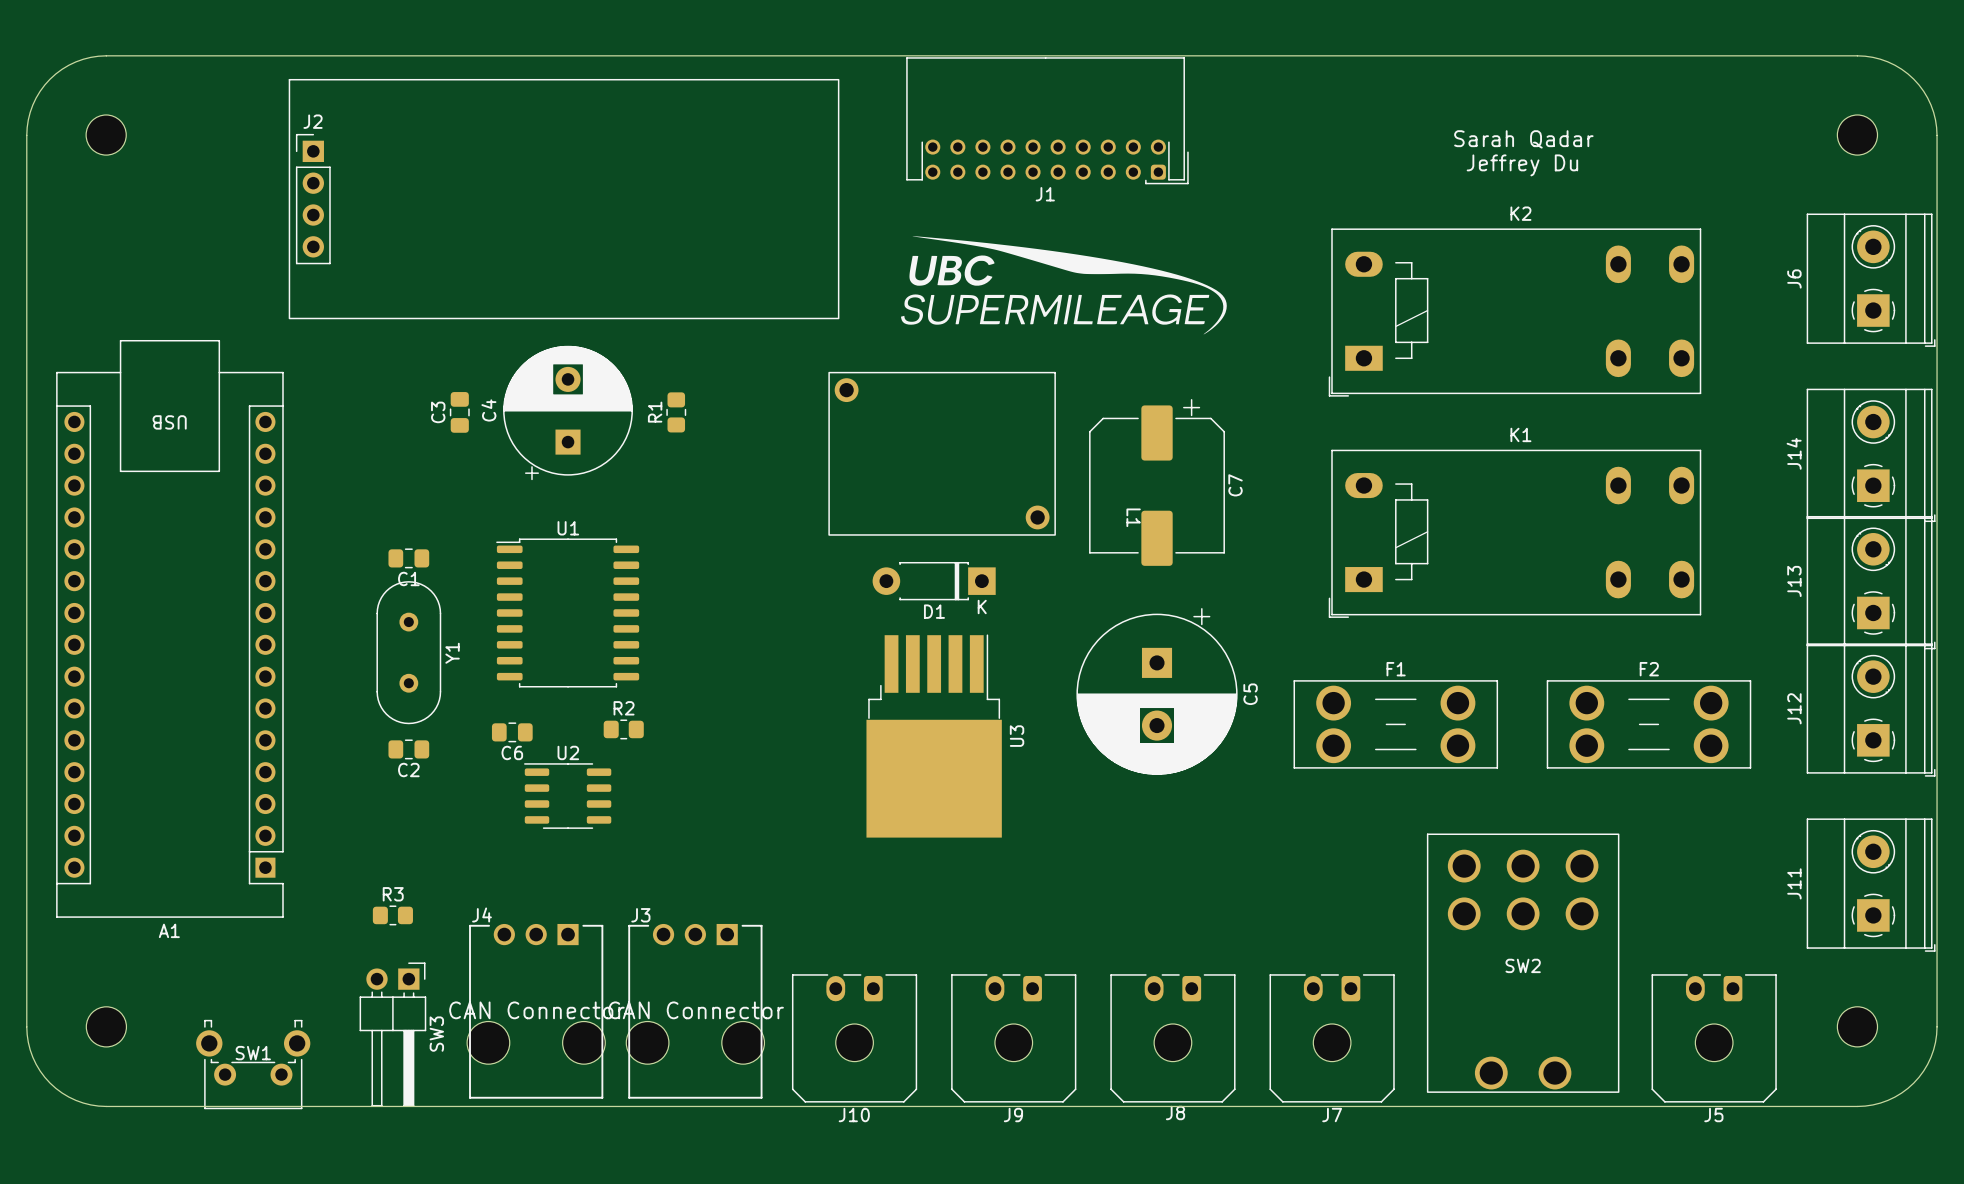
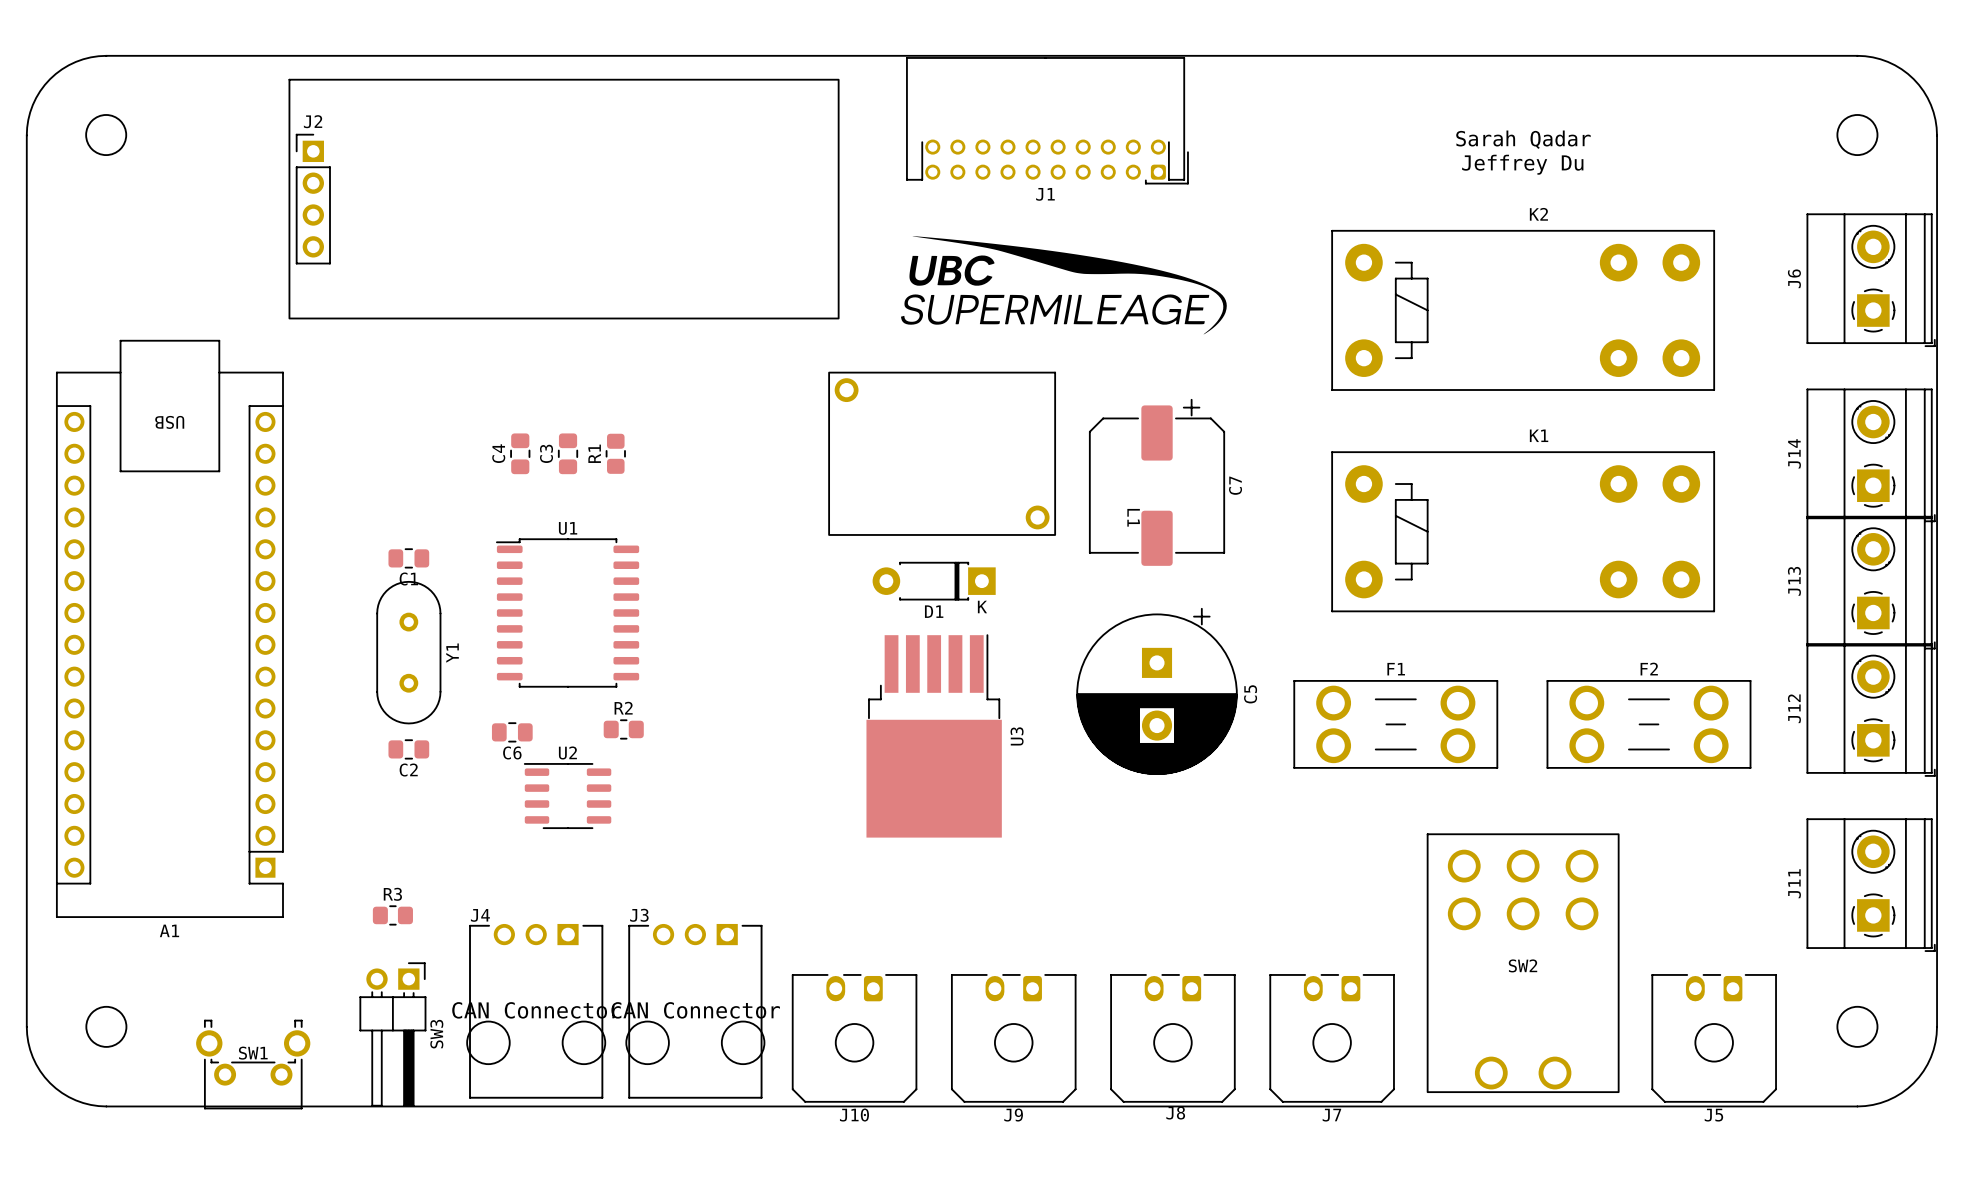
K2 footprint: [1328, 228, 1702, 397] -> [1331, 230, 1715, 391]
C4 footprint: [503, 345, 633, 481] -> [510, 433, 531, 475]
C4 name position: C4 (488, 410) -> C4 (498, 453)
C3 position: (459, 412) -> (568, 453)
R1 position: (676, 412) -> (615, 453)
K1 footprint: [1328, 449, 1702, 618] -> [1331, 451, 1715, 613]

